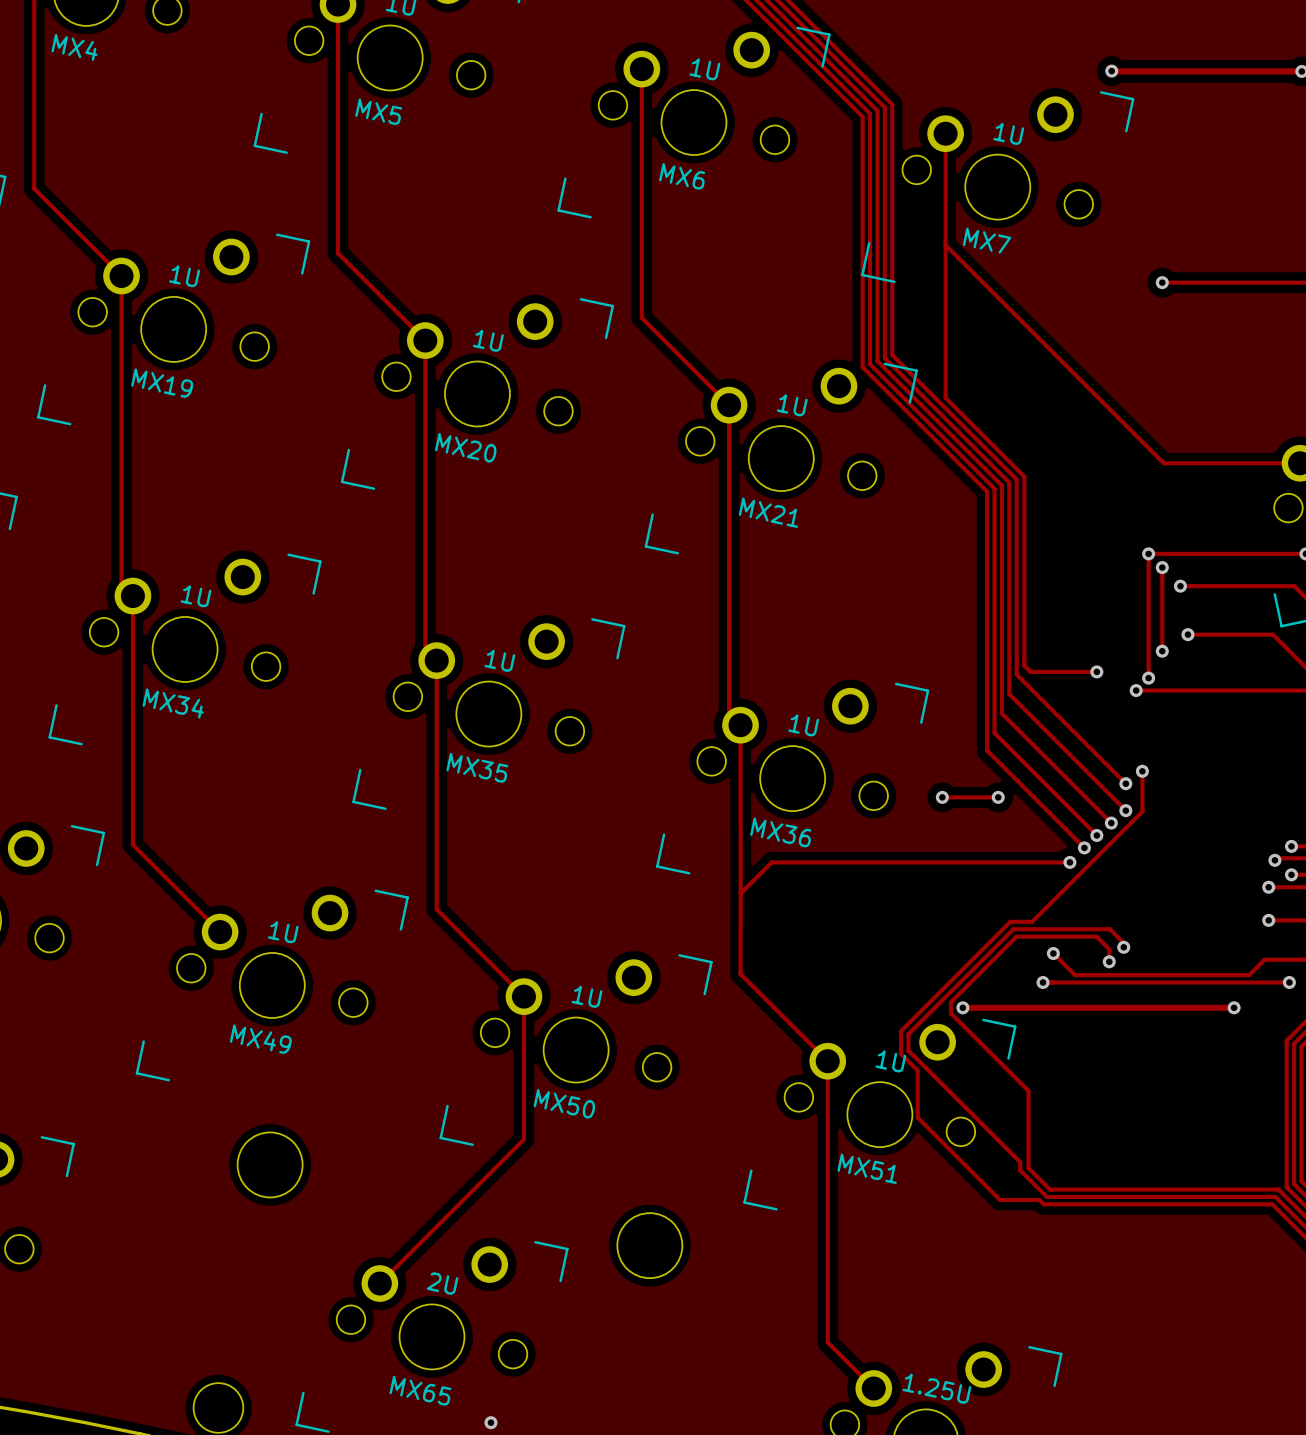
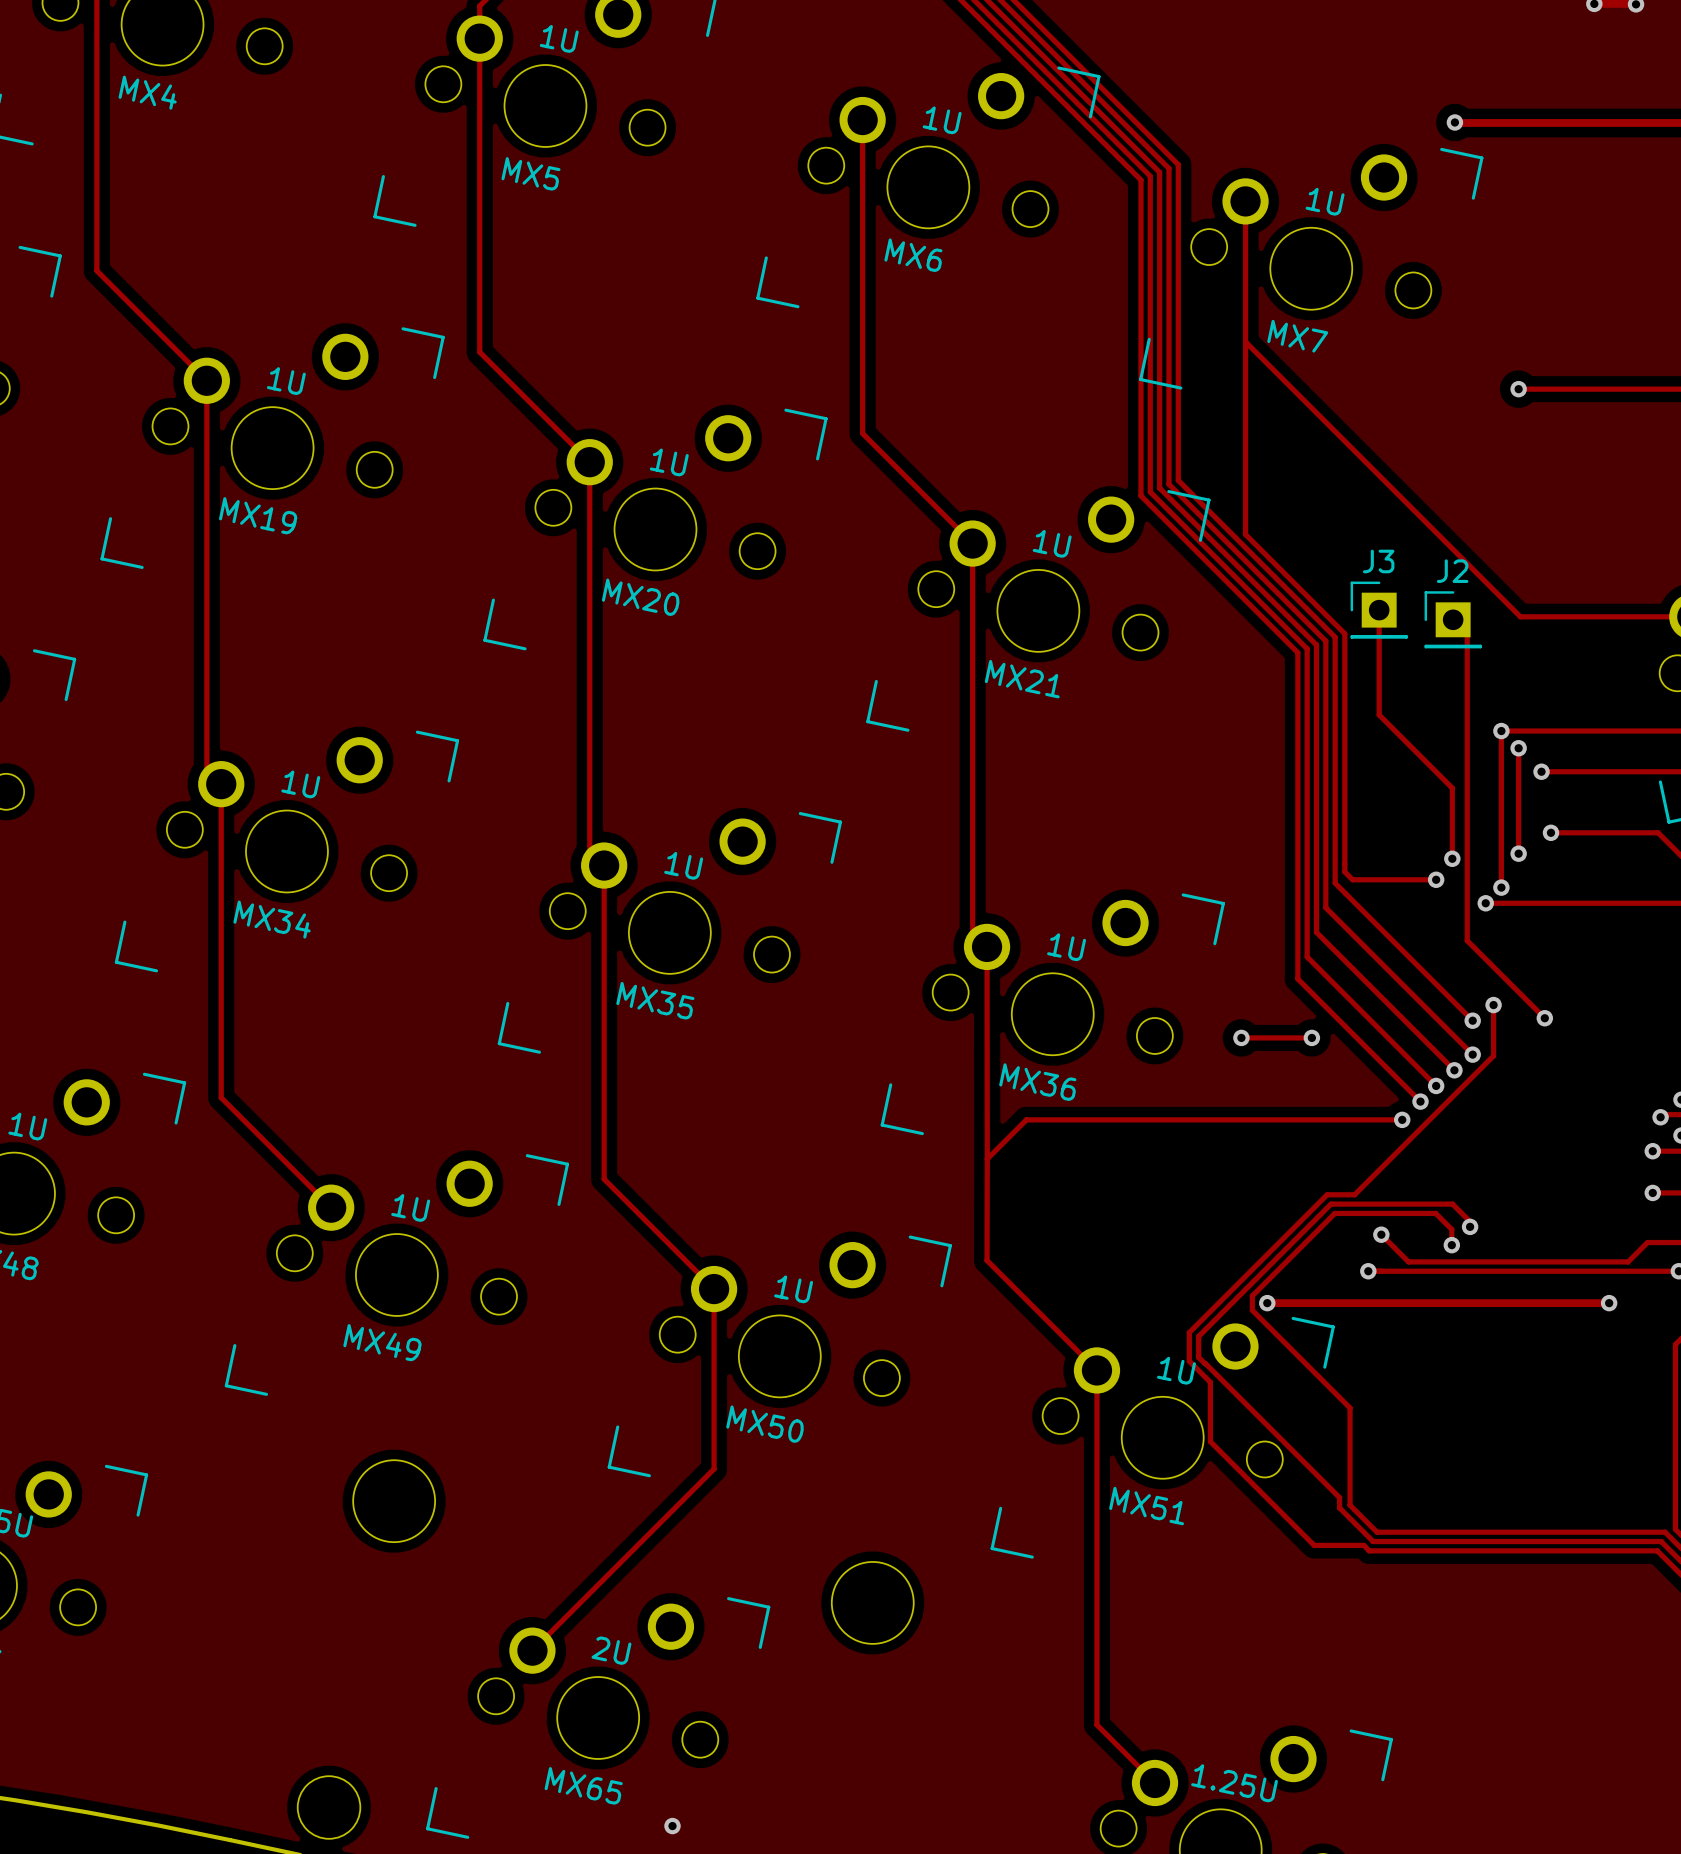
track: none -> (1379, 610) (1379, 714) (1452, 788) (1452, 858)
J3: none -> (1379, 610)
track: none -> (1453, 619) (1467, 633) (1467, 940) (1544, 1018)
J2: none -> (1453, 619)
via: none -> (1452, 858)
via: none -> (1544, 1018)

